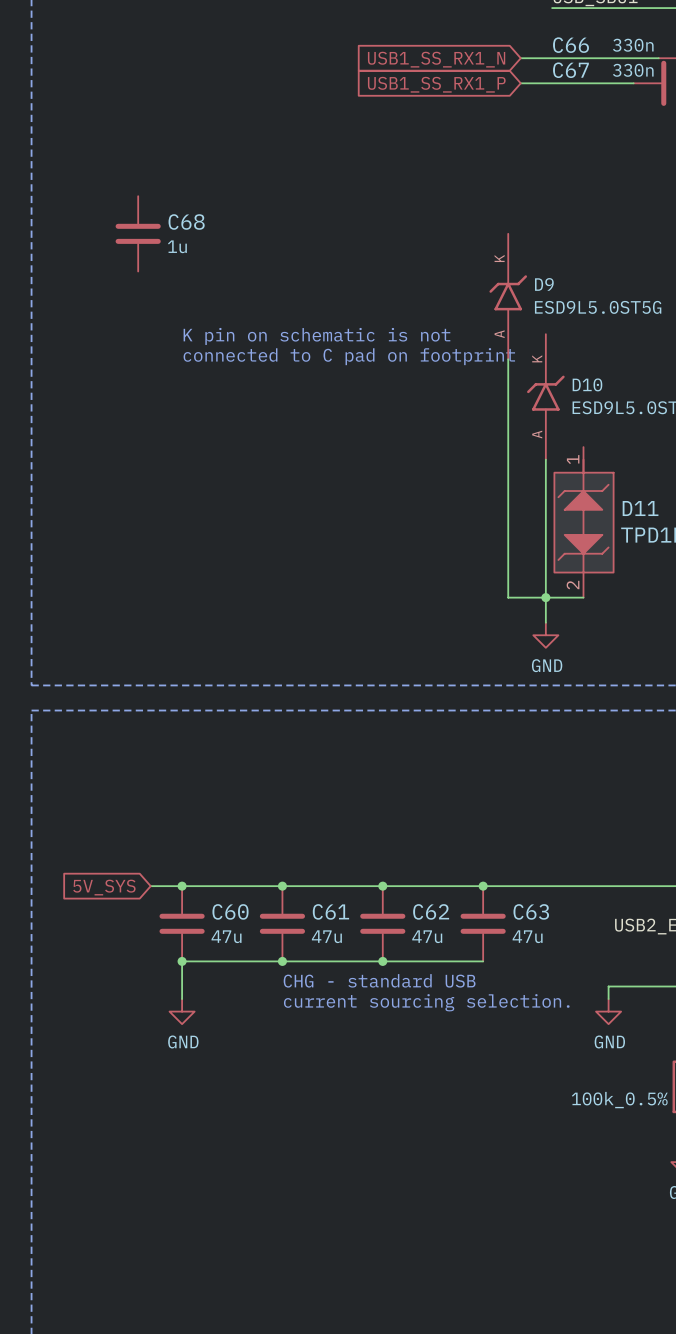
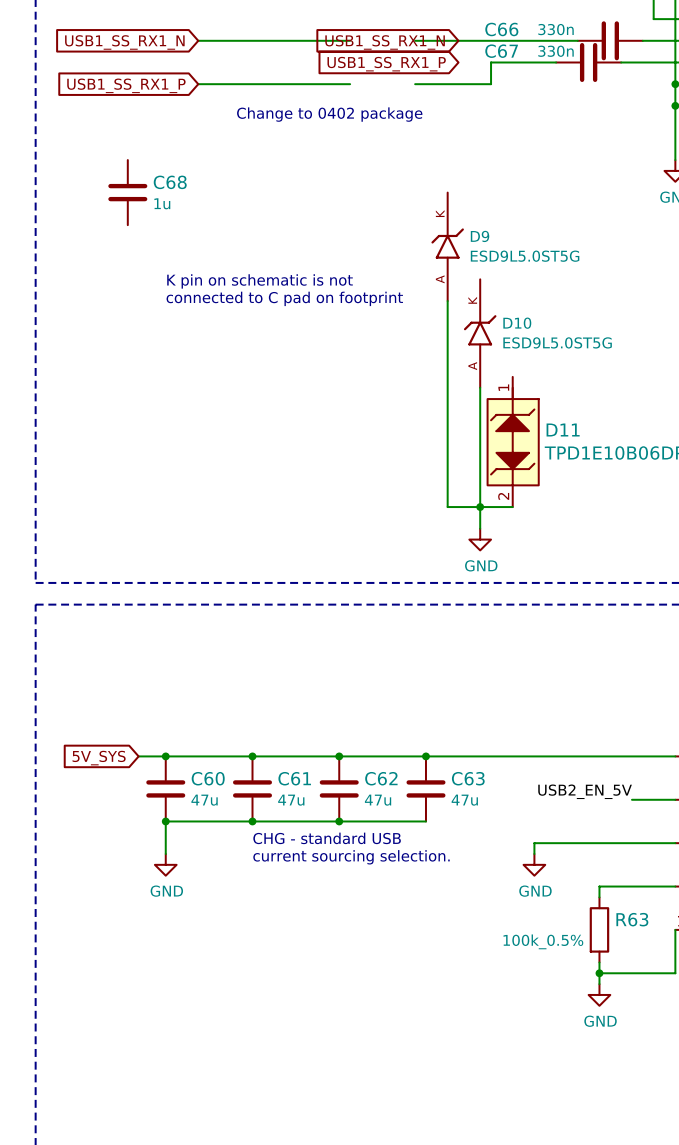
wire: none -> (198, 40) (350, 40)
wire: none -> (415, 40) (458, 40)
global label: none -> USB1_SS_RX1_N (124, 42)
wire: (520, 83) (558, 83) -> (415, 84) (491, 84) (491, 62)
wire: none -> (198, 84) (350, 84)
global label: none -> USB1_SS_RX1_P (126, 85)
text: none -> Change to 0402 package (329, 114)

